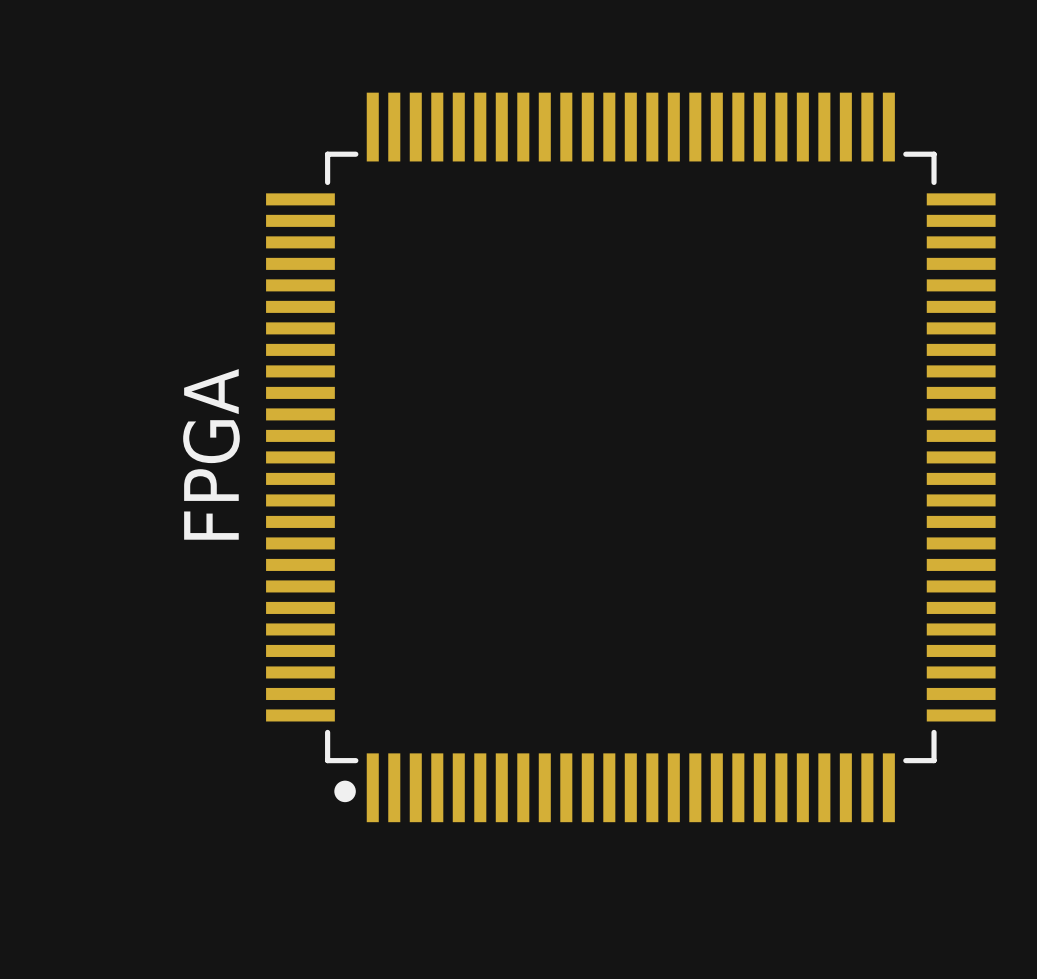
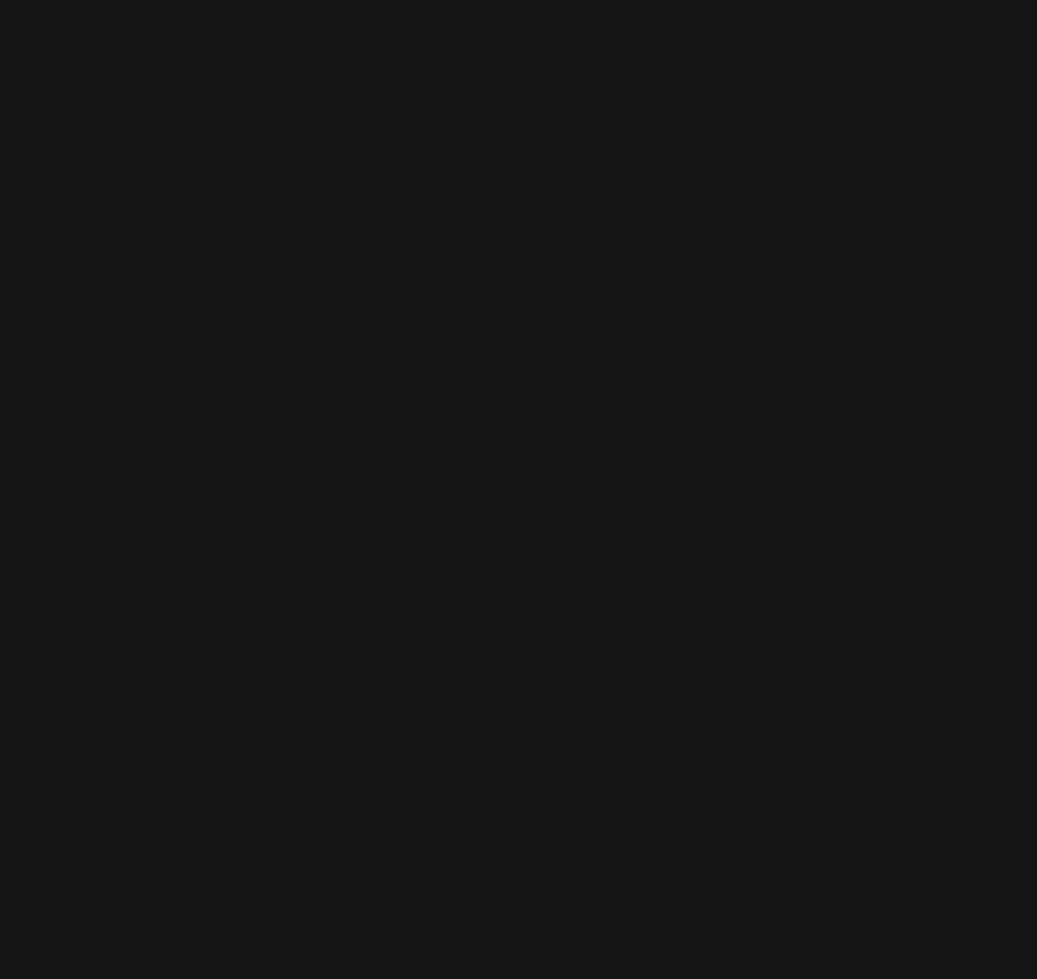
FPGA: (630, 457) -> none

